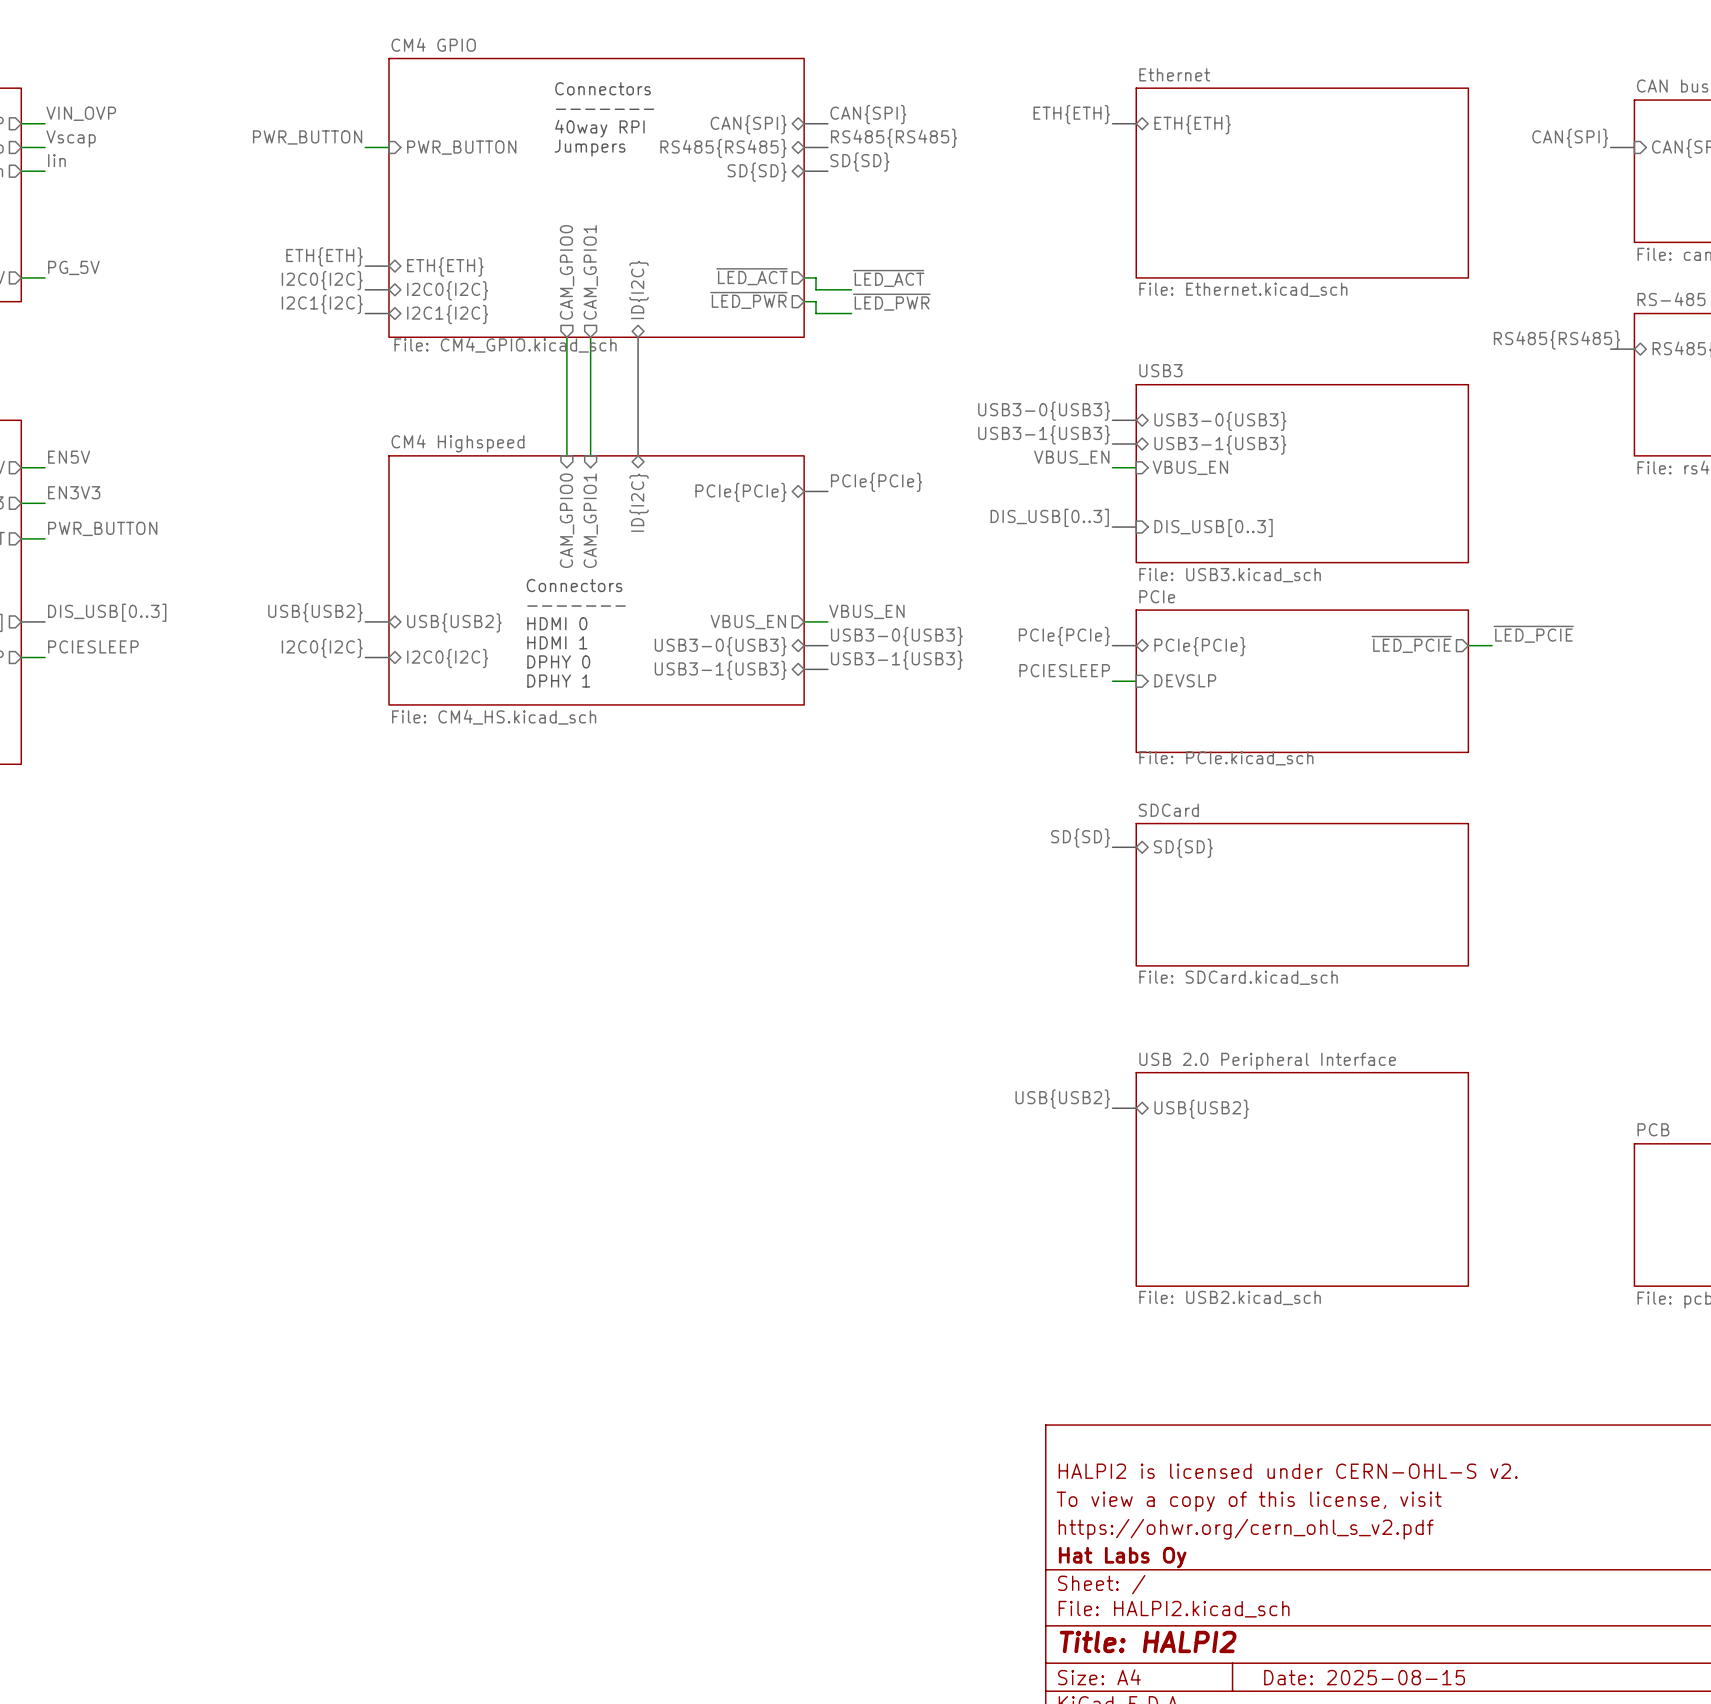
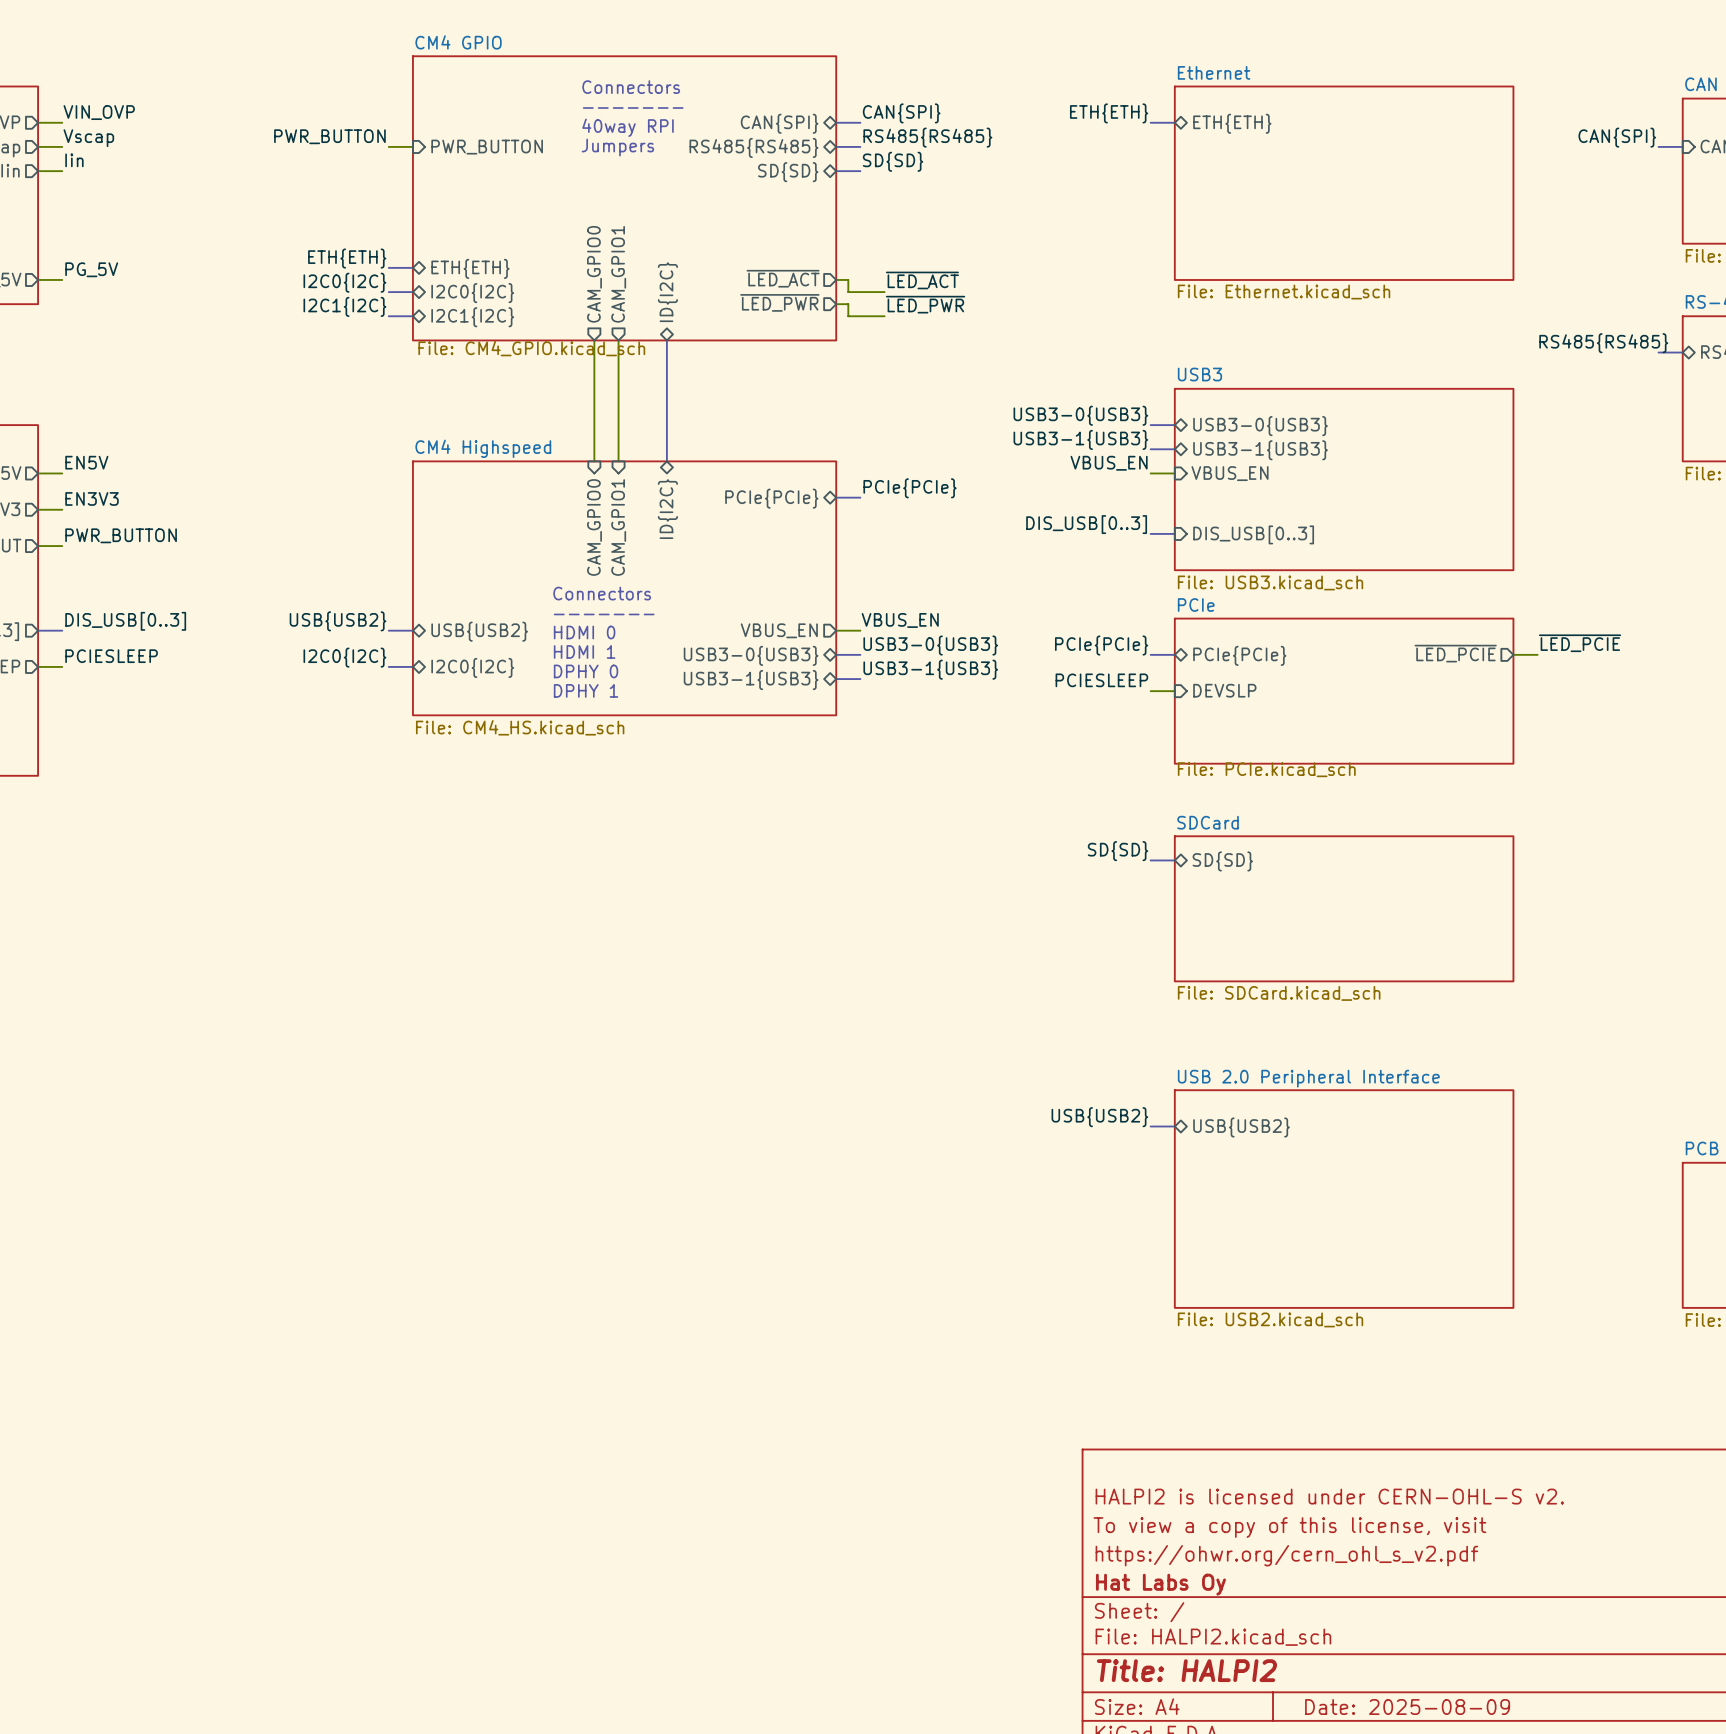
title block: Date: 2025-08-15 (1364, 1677) -> Date: 2025-08-09 (1407, 1707)

